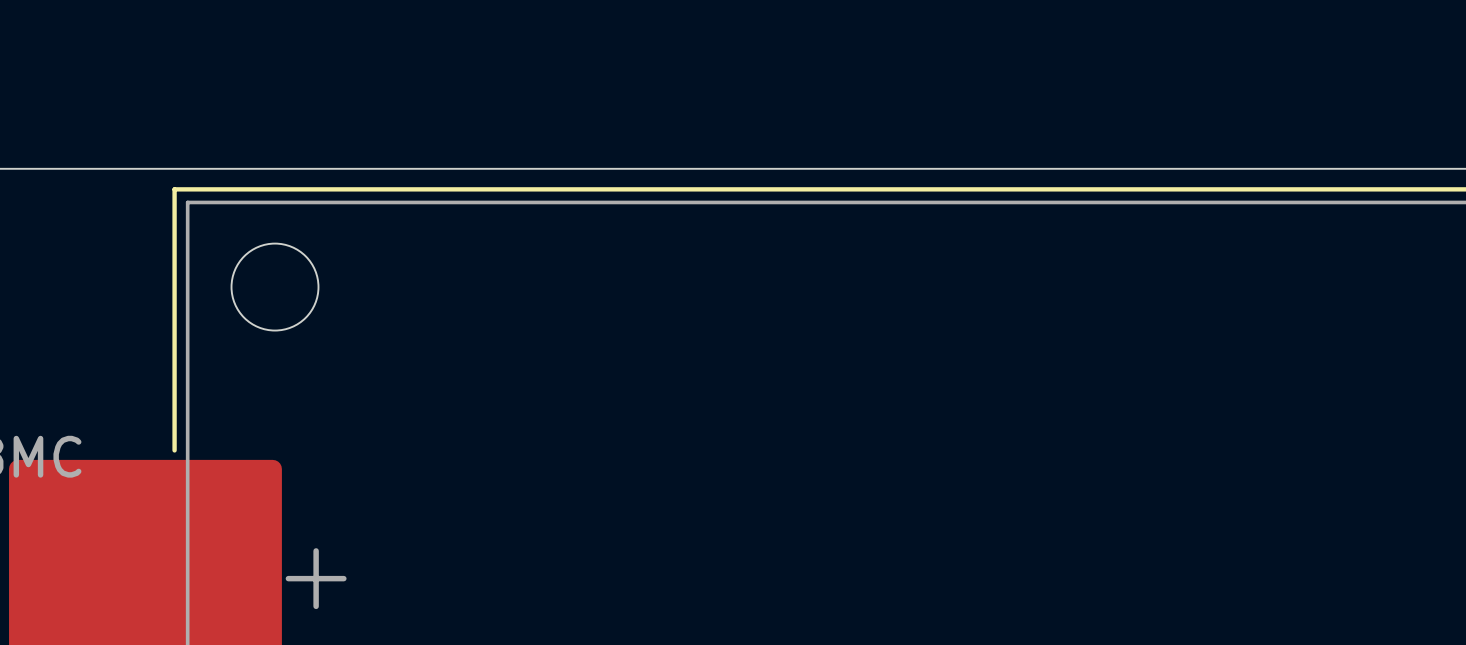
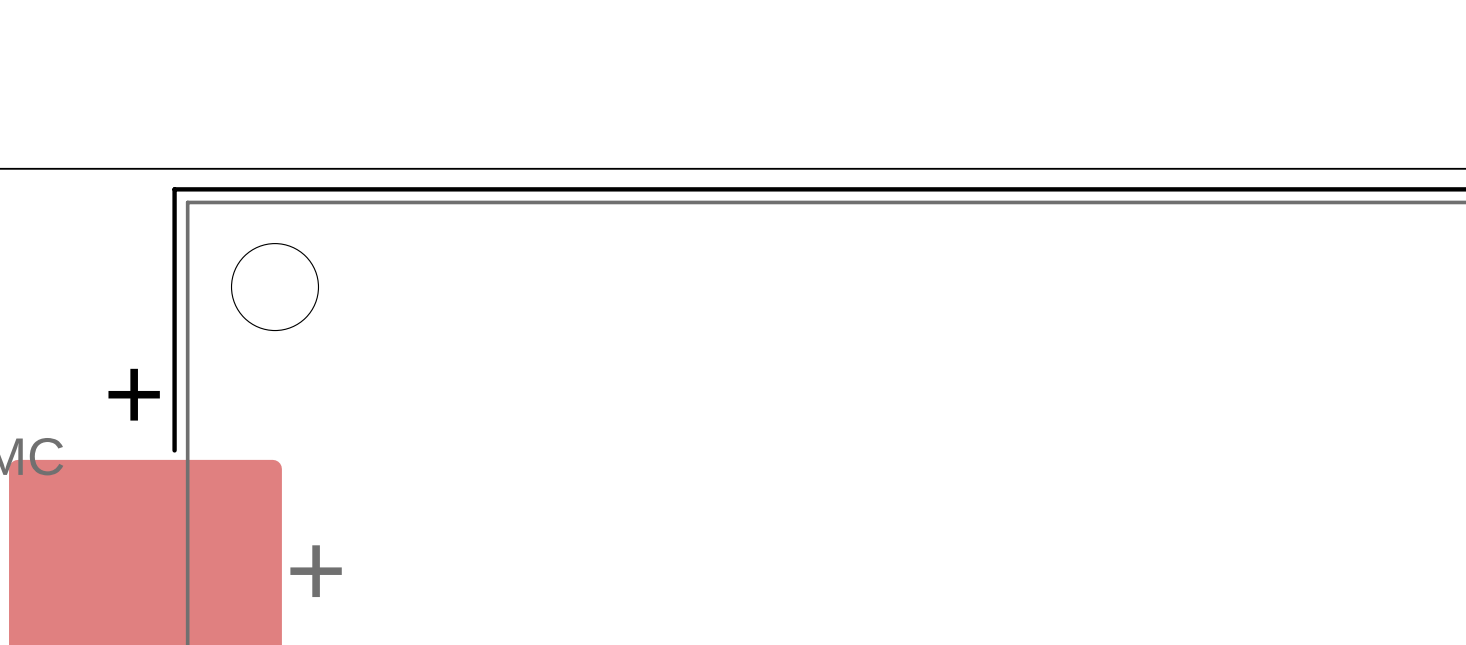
part text: none -> + (134, 394)

